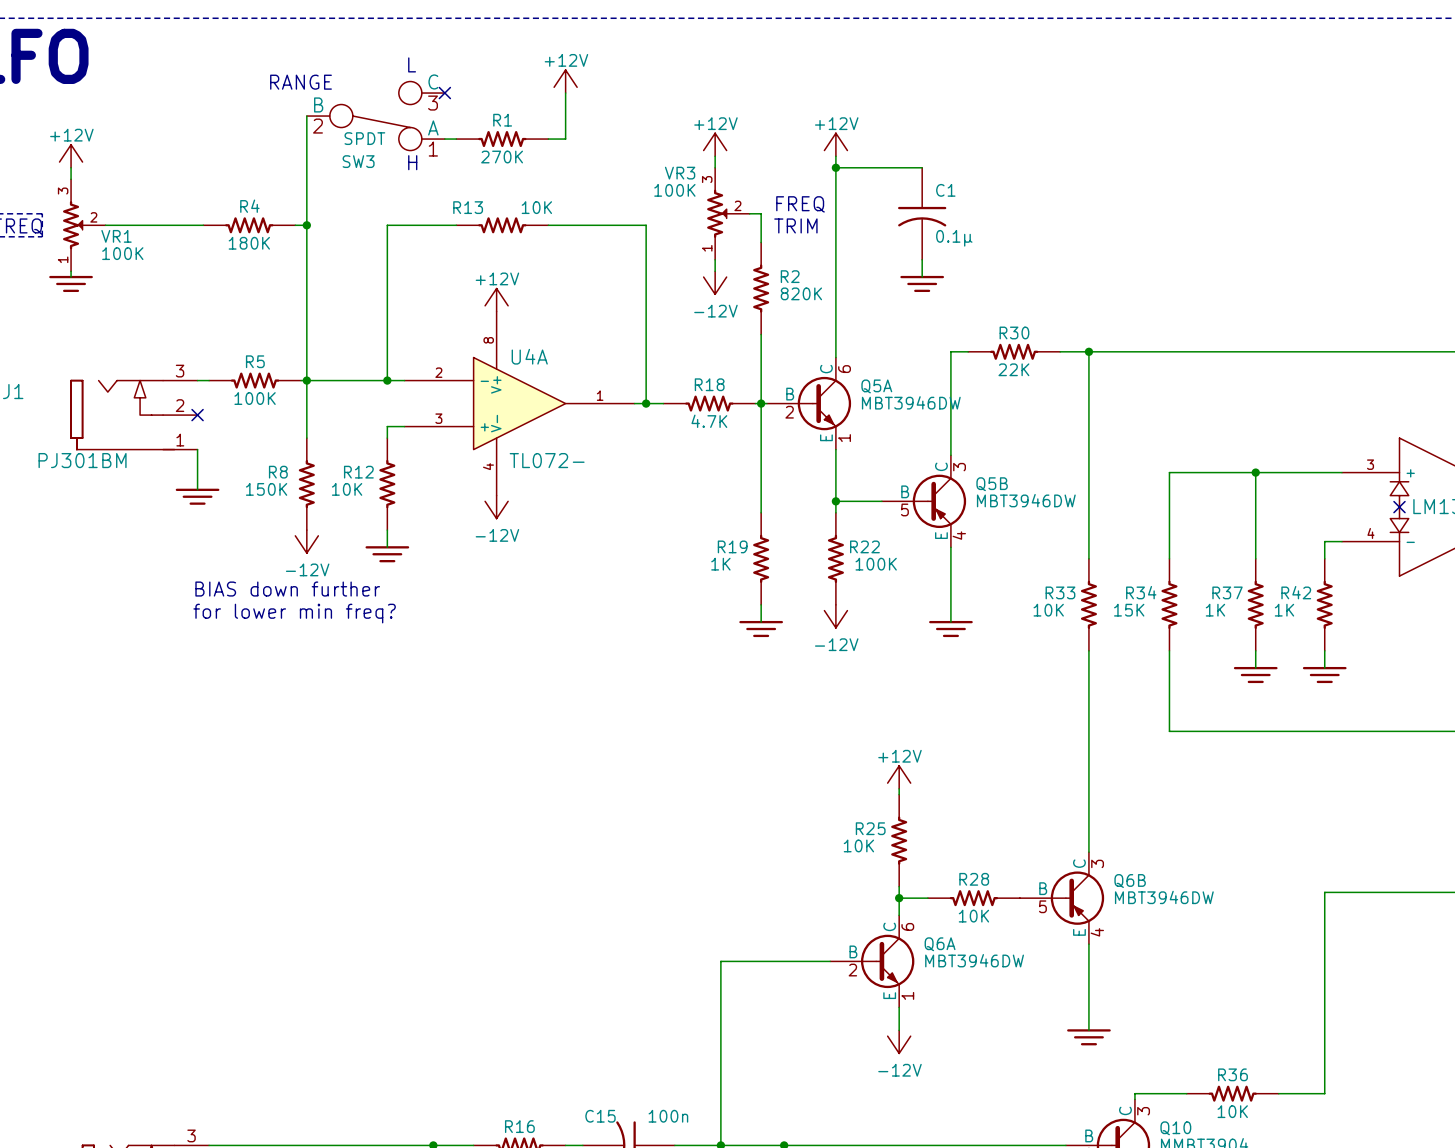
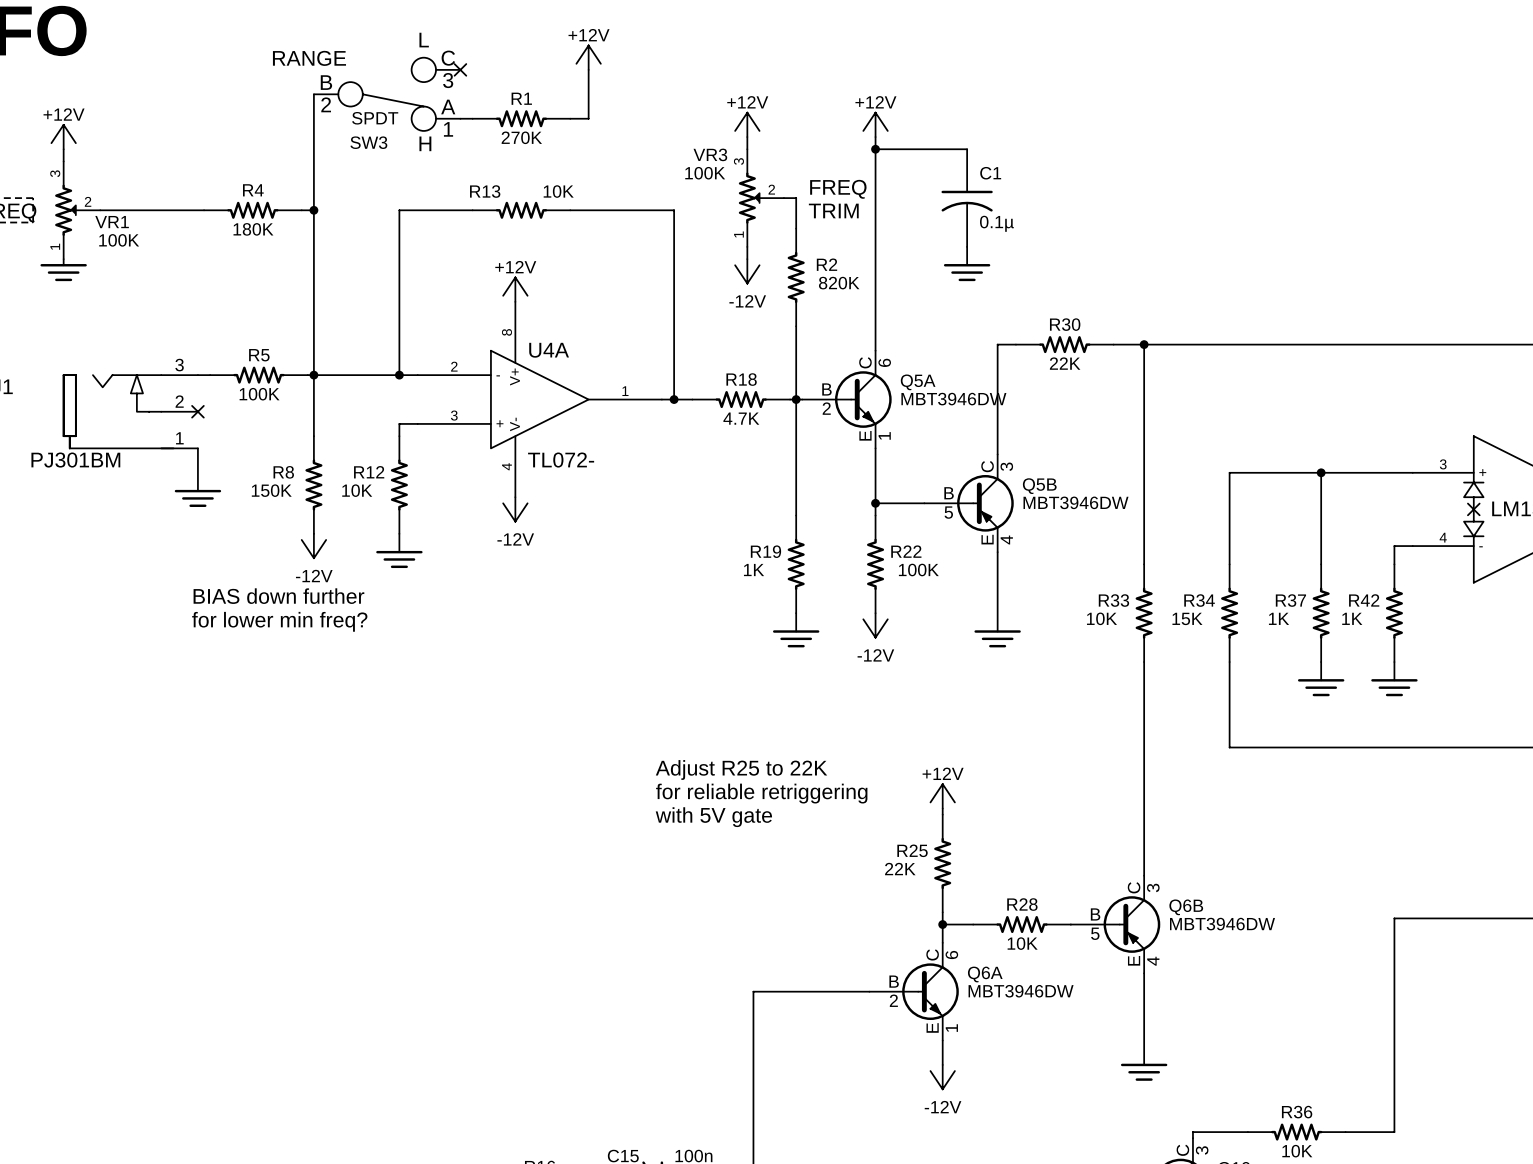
text: none -> Adjust R25 to 22K (741, 769)
text: none -> for reliable retriggering (761, 793)
text: none -> with 5V gate (713, 817)
R25 value: 10K (858, 845) -> 22K (900, 869)

